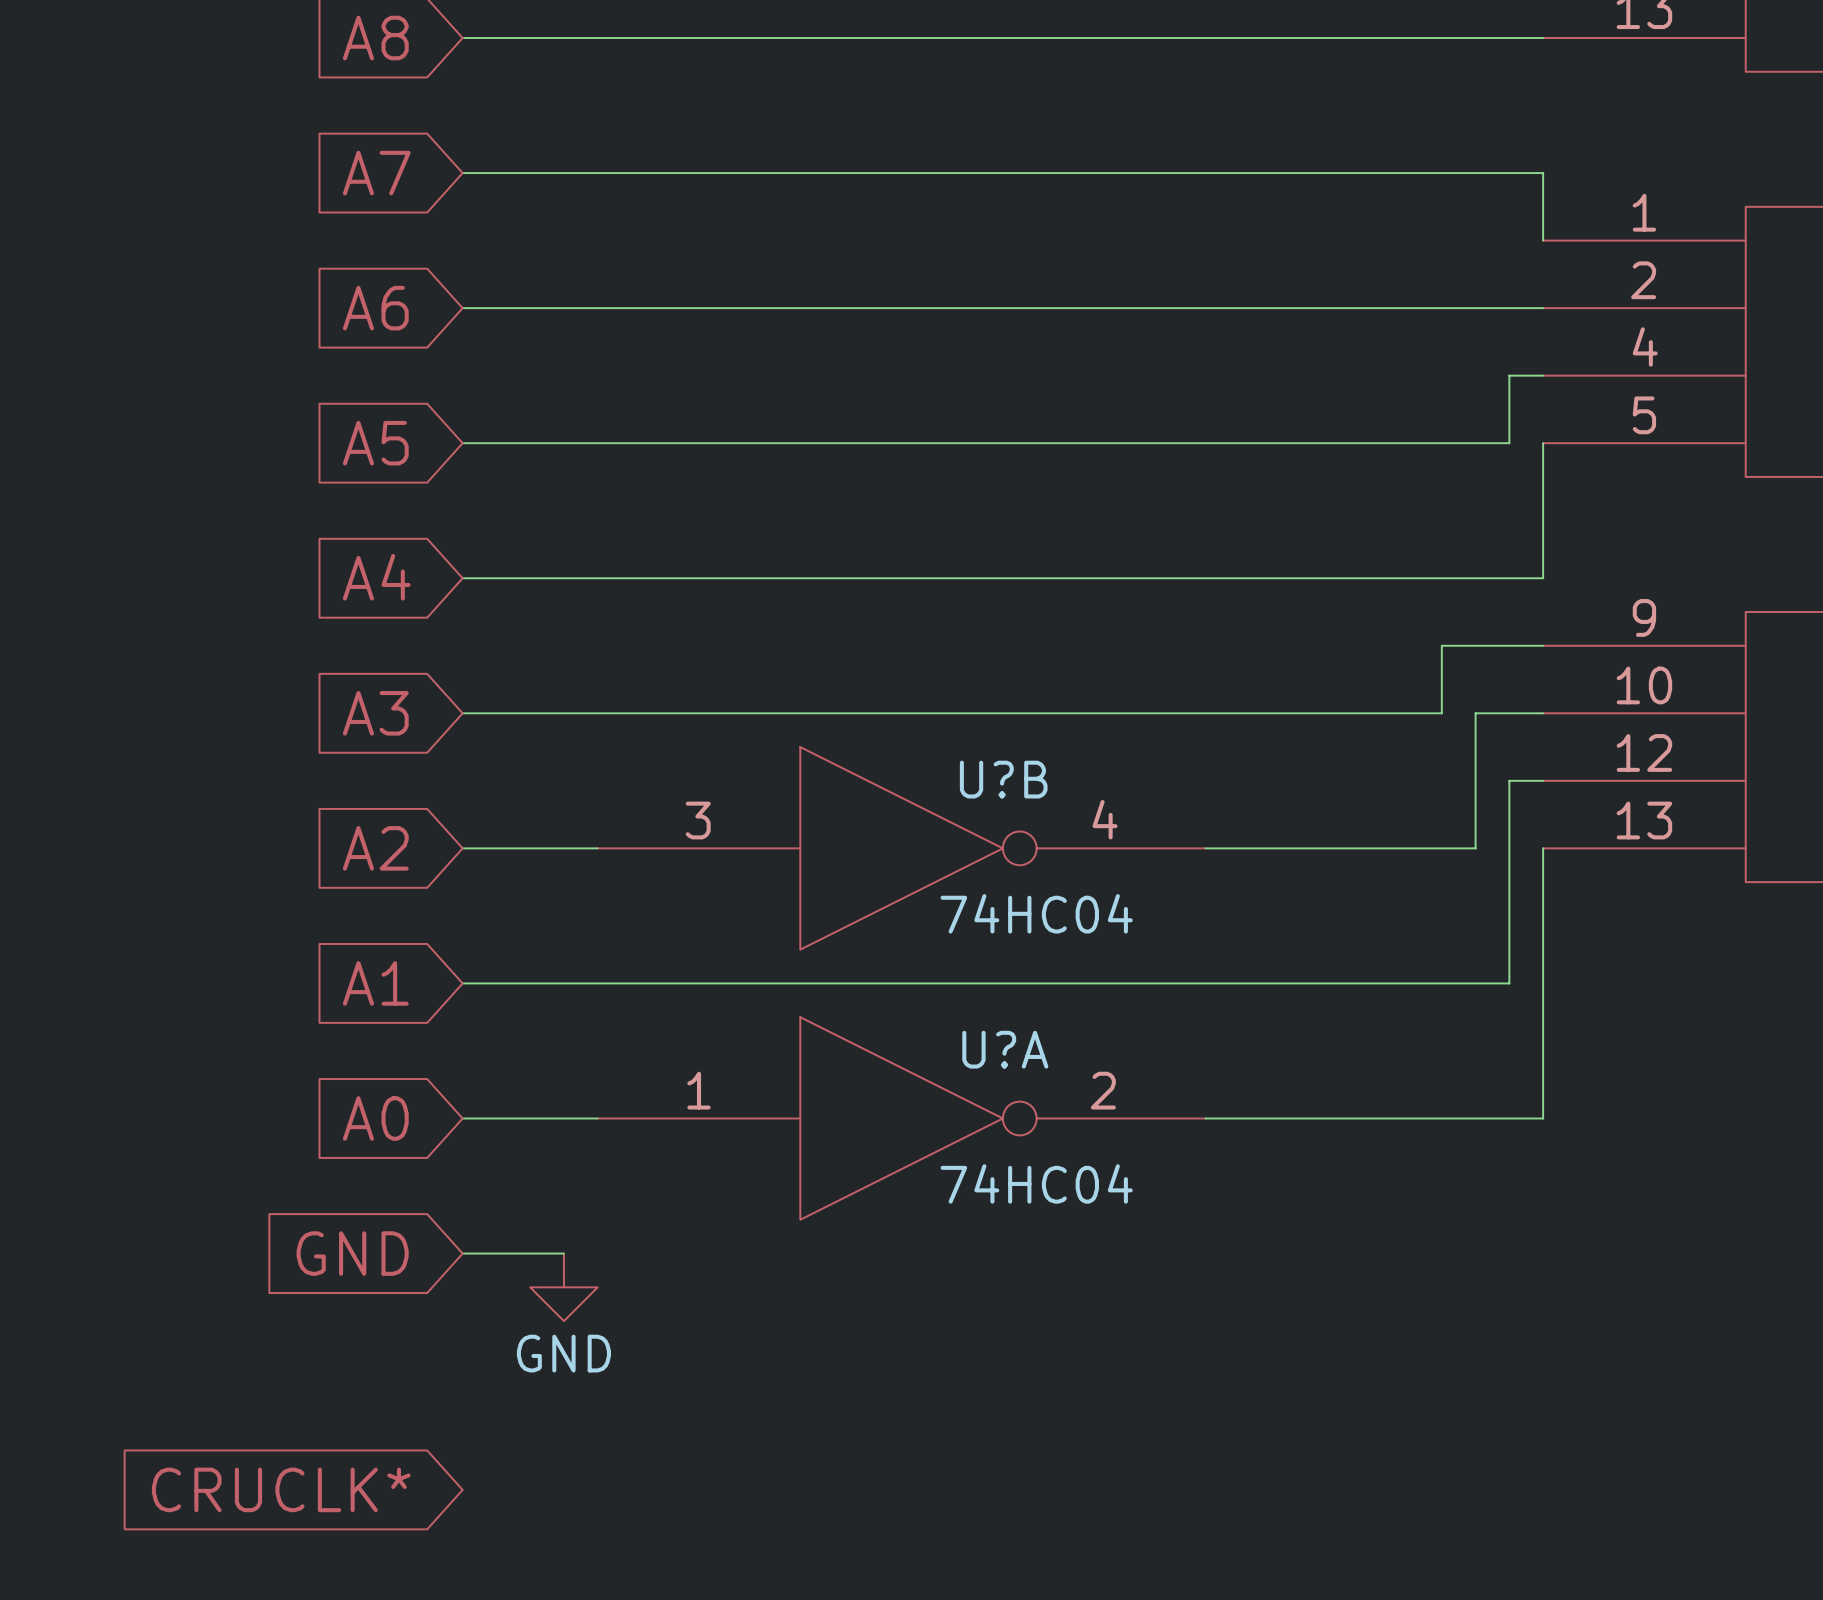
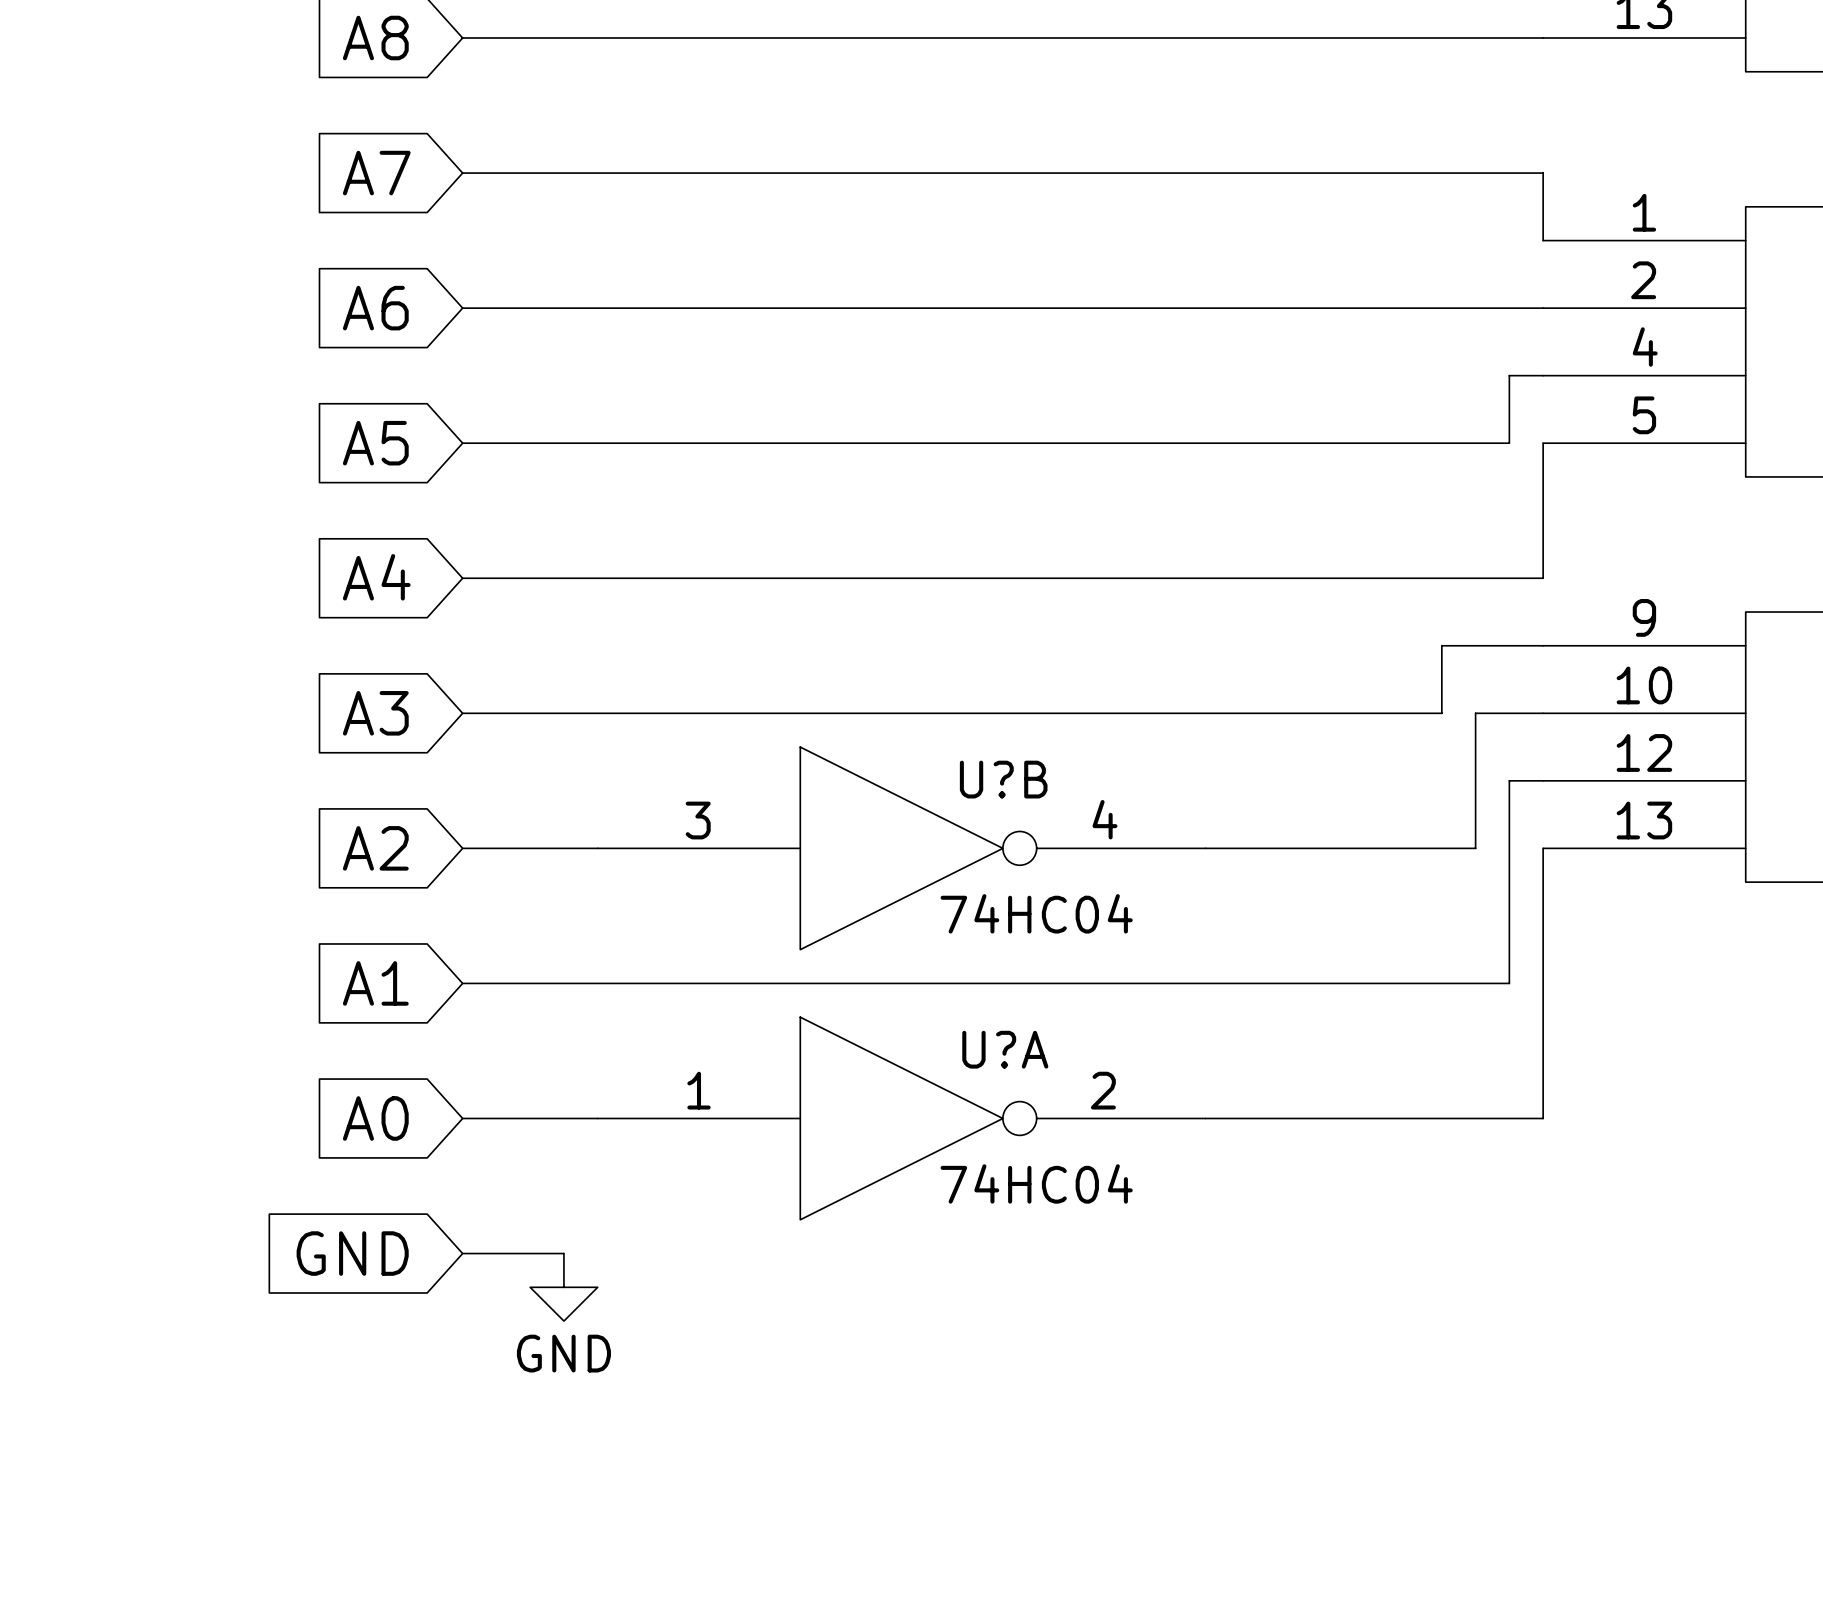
global label: CRUCLK* (281, 1489) -> none

